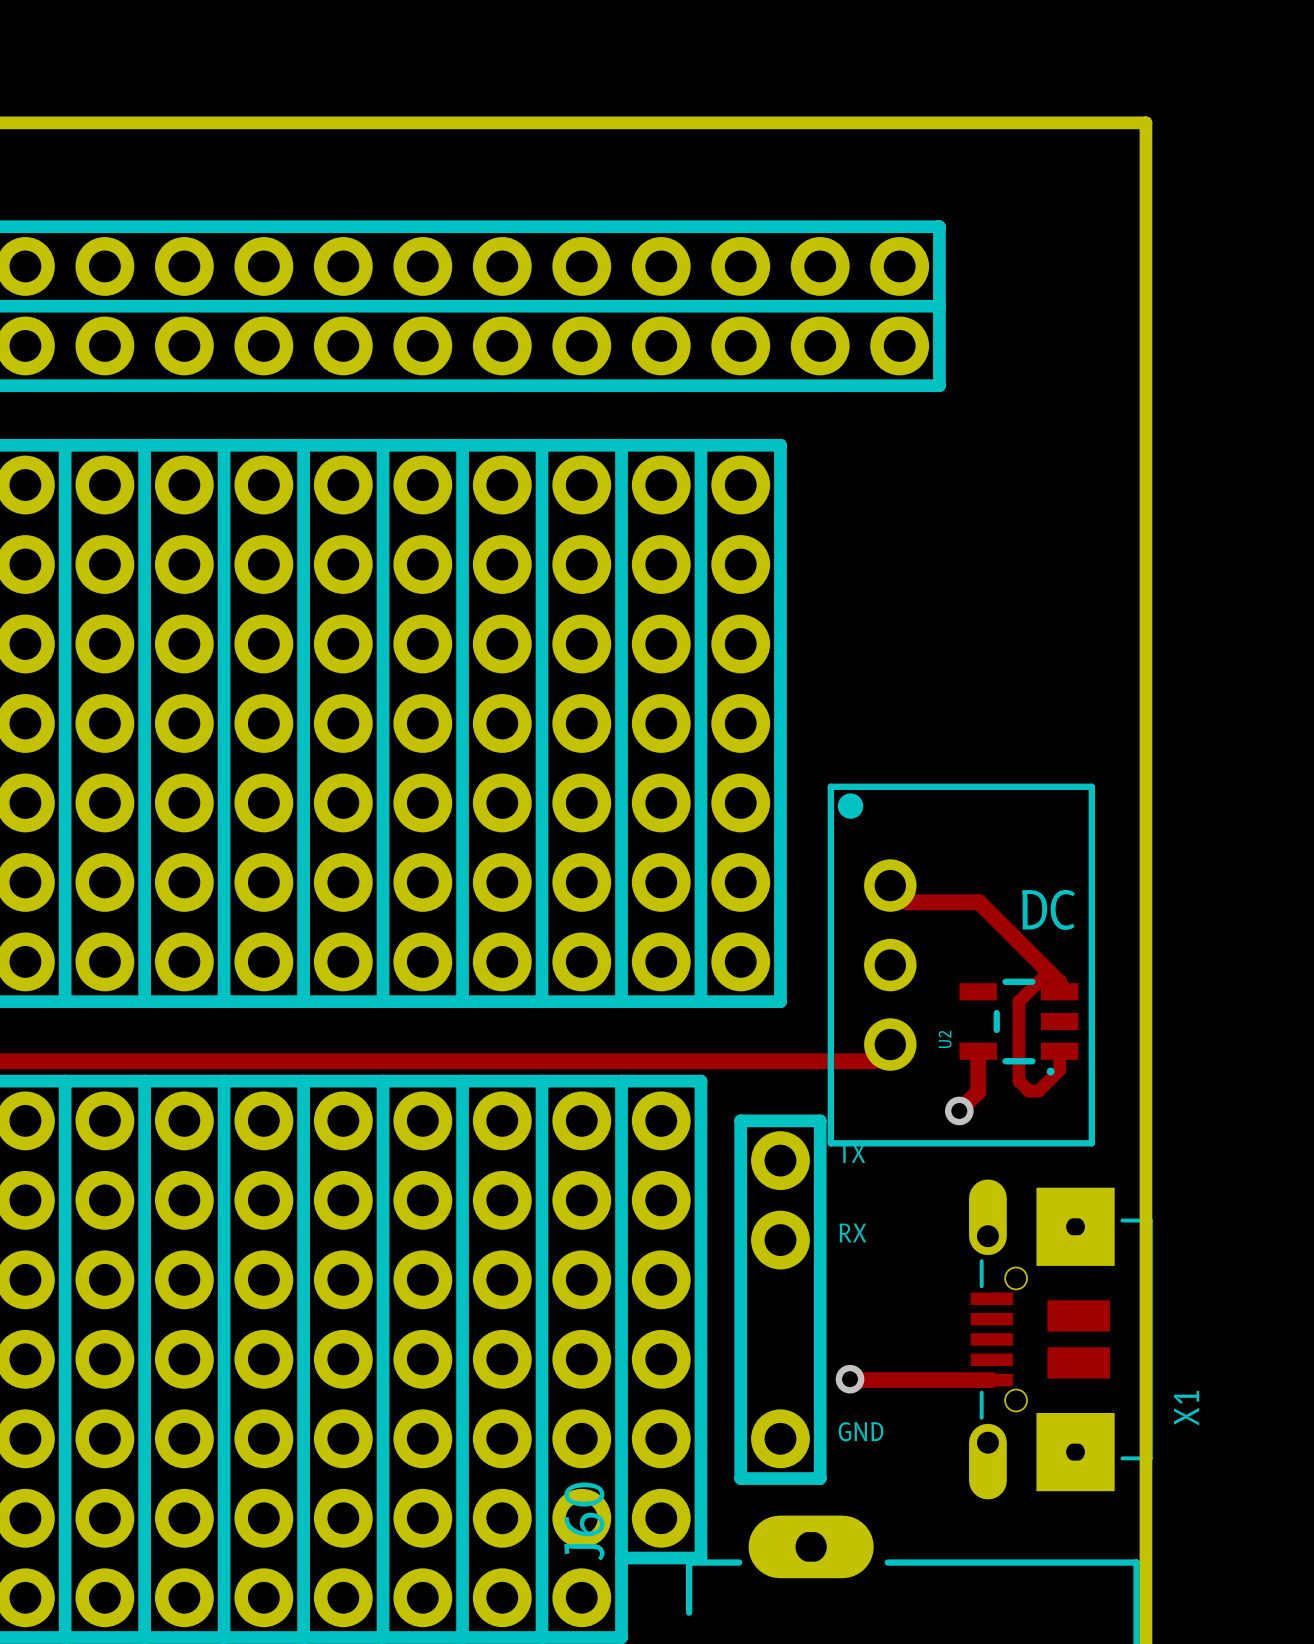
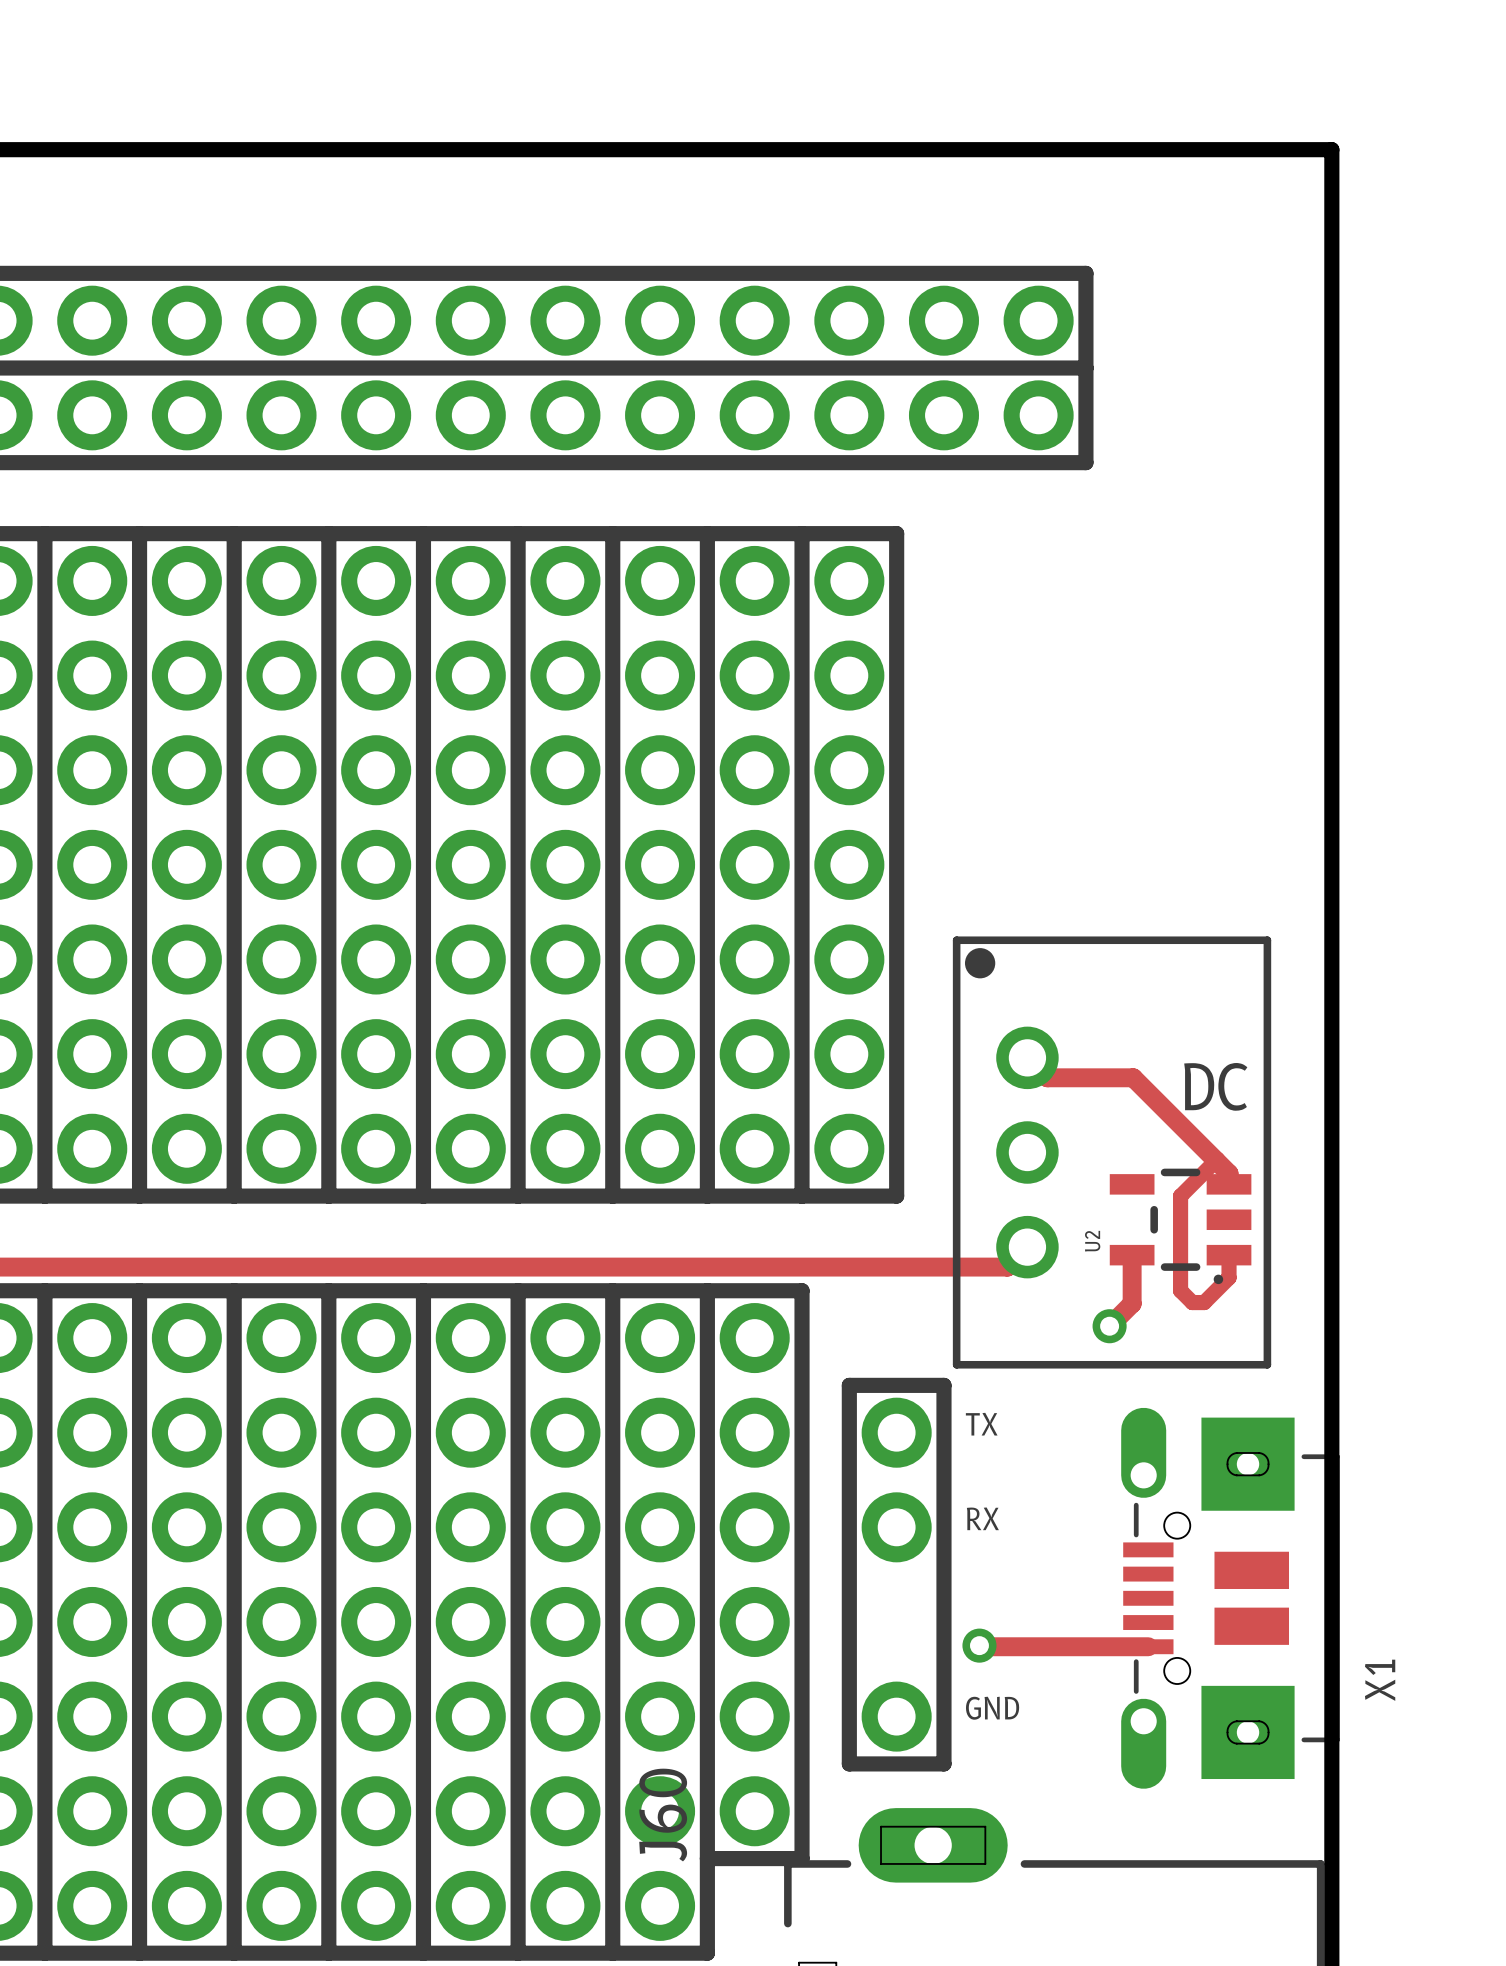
line: (740, 1160) (740, 1120) (820, 1120) (820, 1160) -> (849, 1385) (943, 1385)
TX position: (780, 1160) -> (896, 1432)
RX position: (780, 1240) -> (896, 1527)

